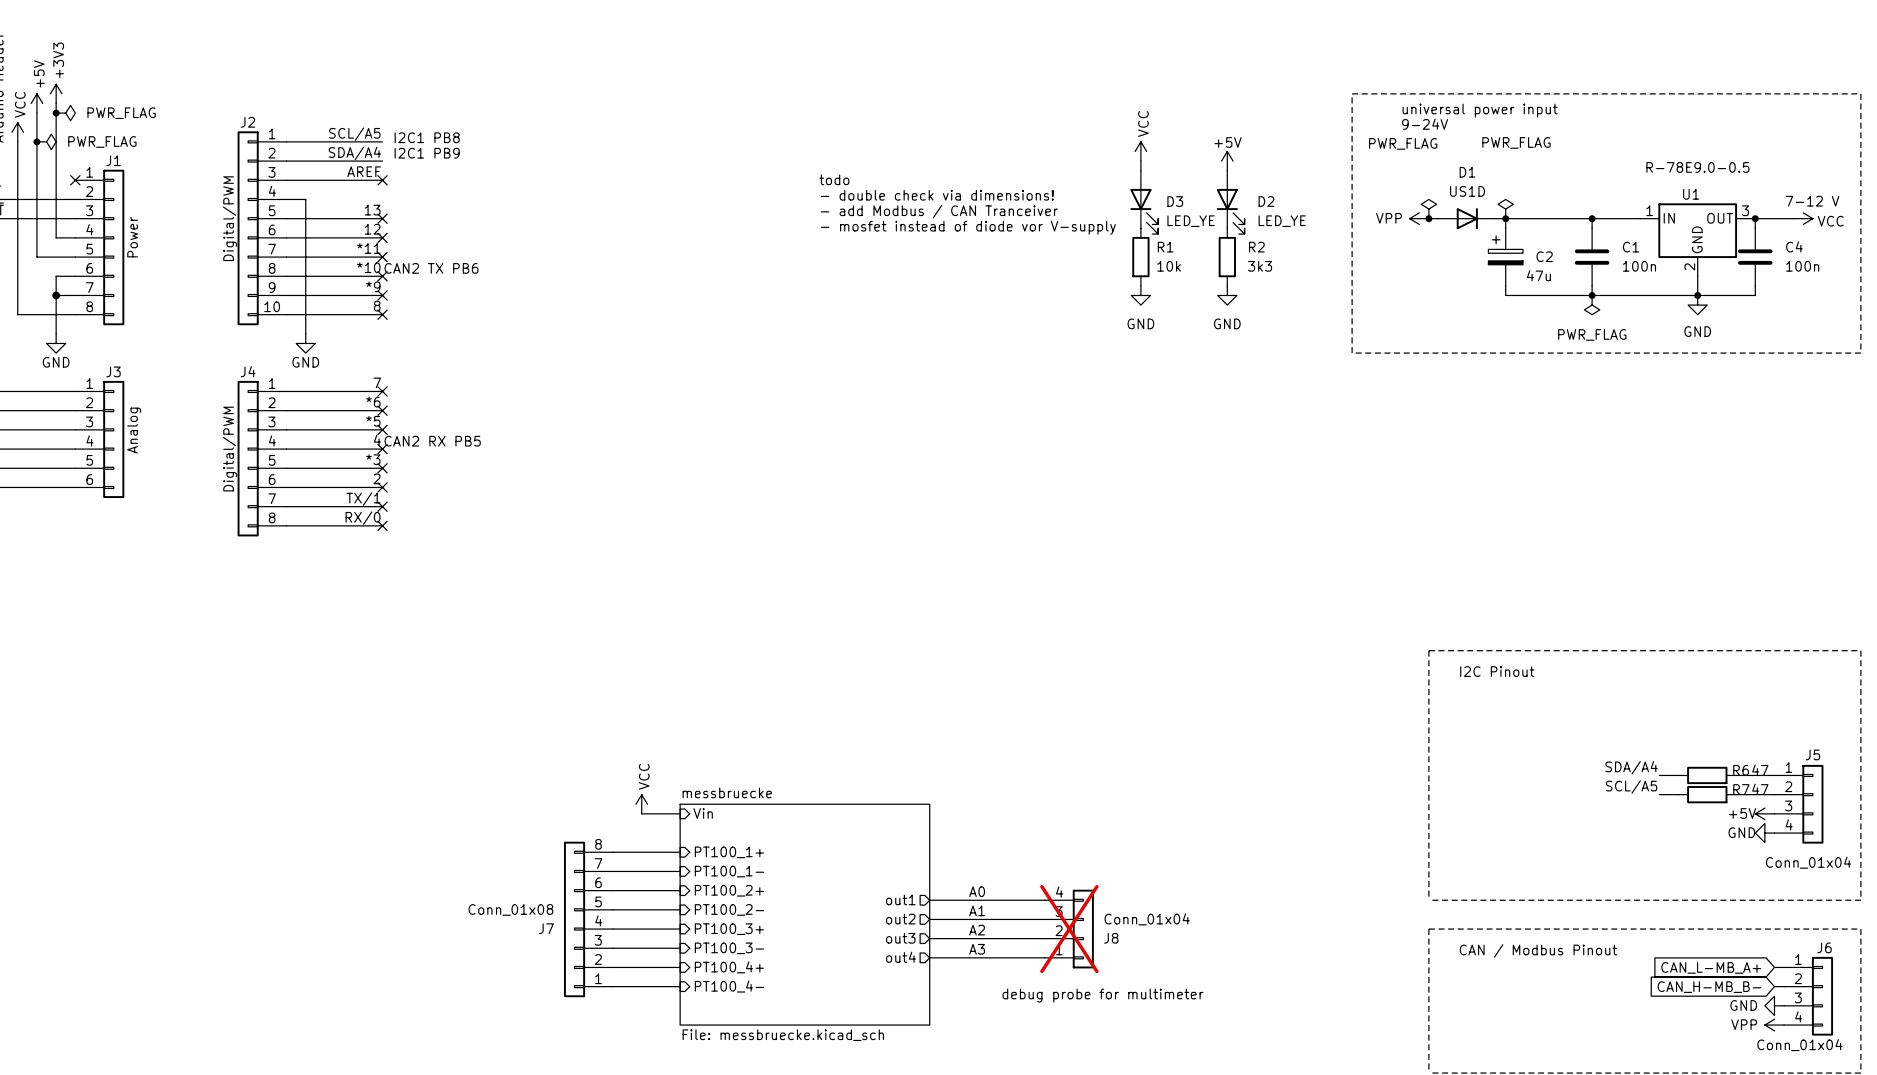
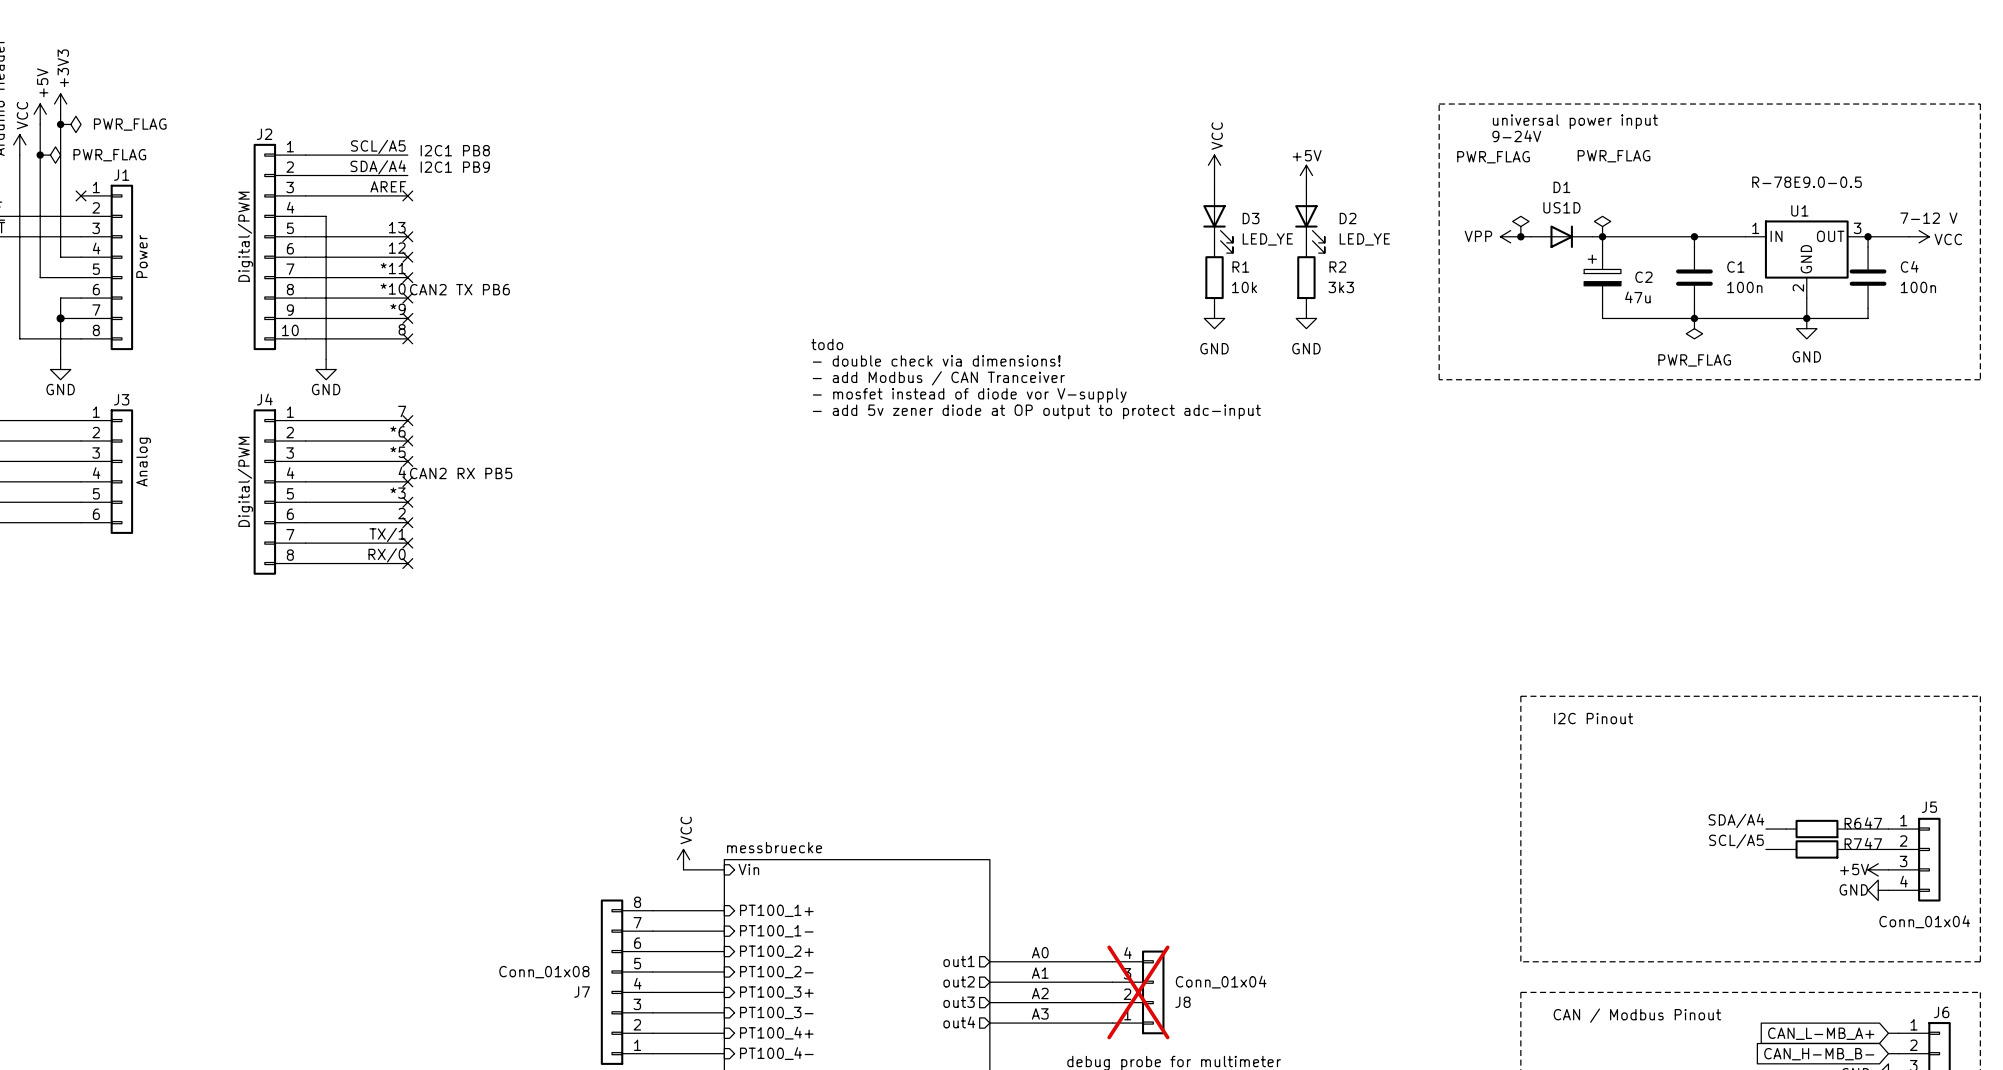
text position: todo (834, 179) -> todo (827, 344)
text position: - double check via dimensions! (937, 195) -> - double check via dimensions! (936, 360)
text position: - add Modbus / CAN Tranceiver (939, 211) -> - add Modbus / CAN Tranceiver (938, 378)
text position: - mosfet instead of diode vor V-supply (968, 227) -> - mosfet instead of diode vor V-supply (969, 395)
text: none -> - add 5v zener diode at OP output to protect adc-input (1036, 411)

